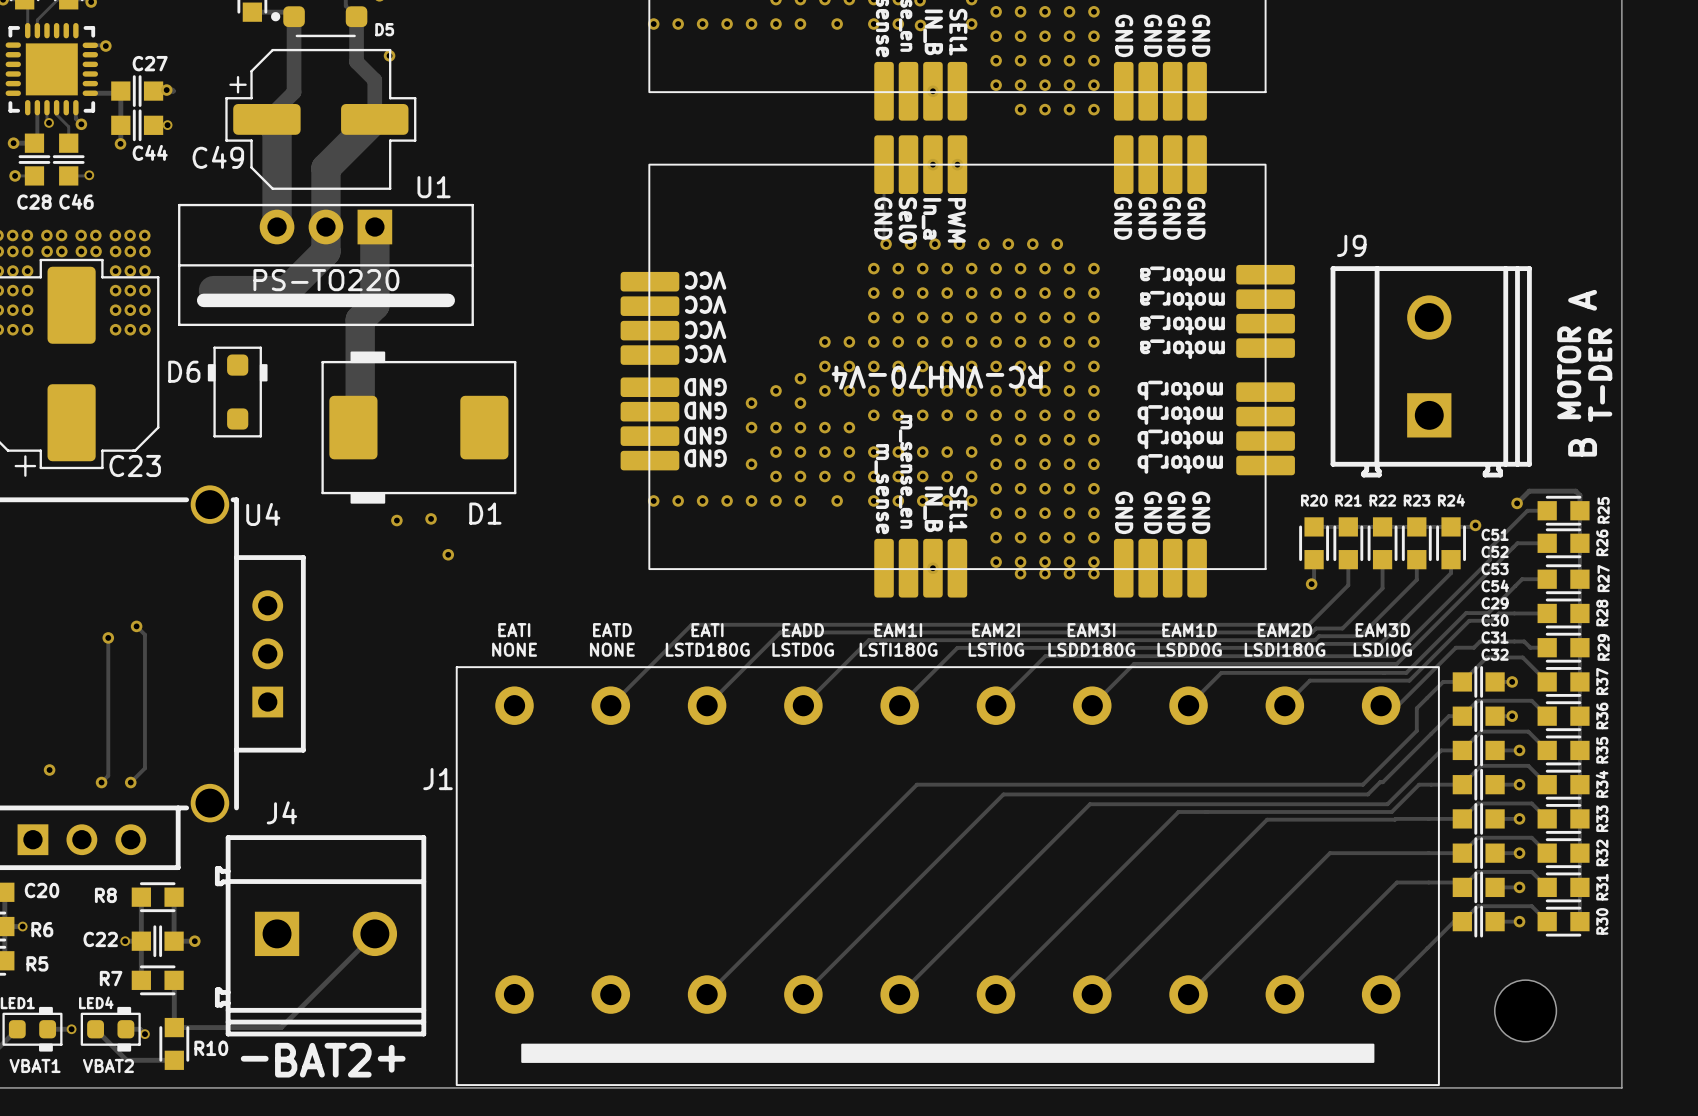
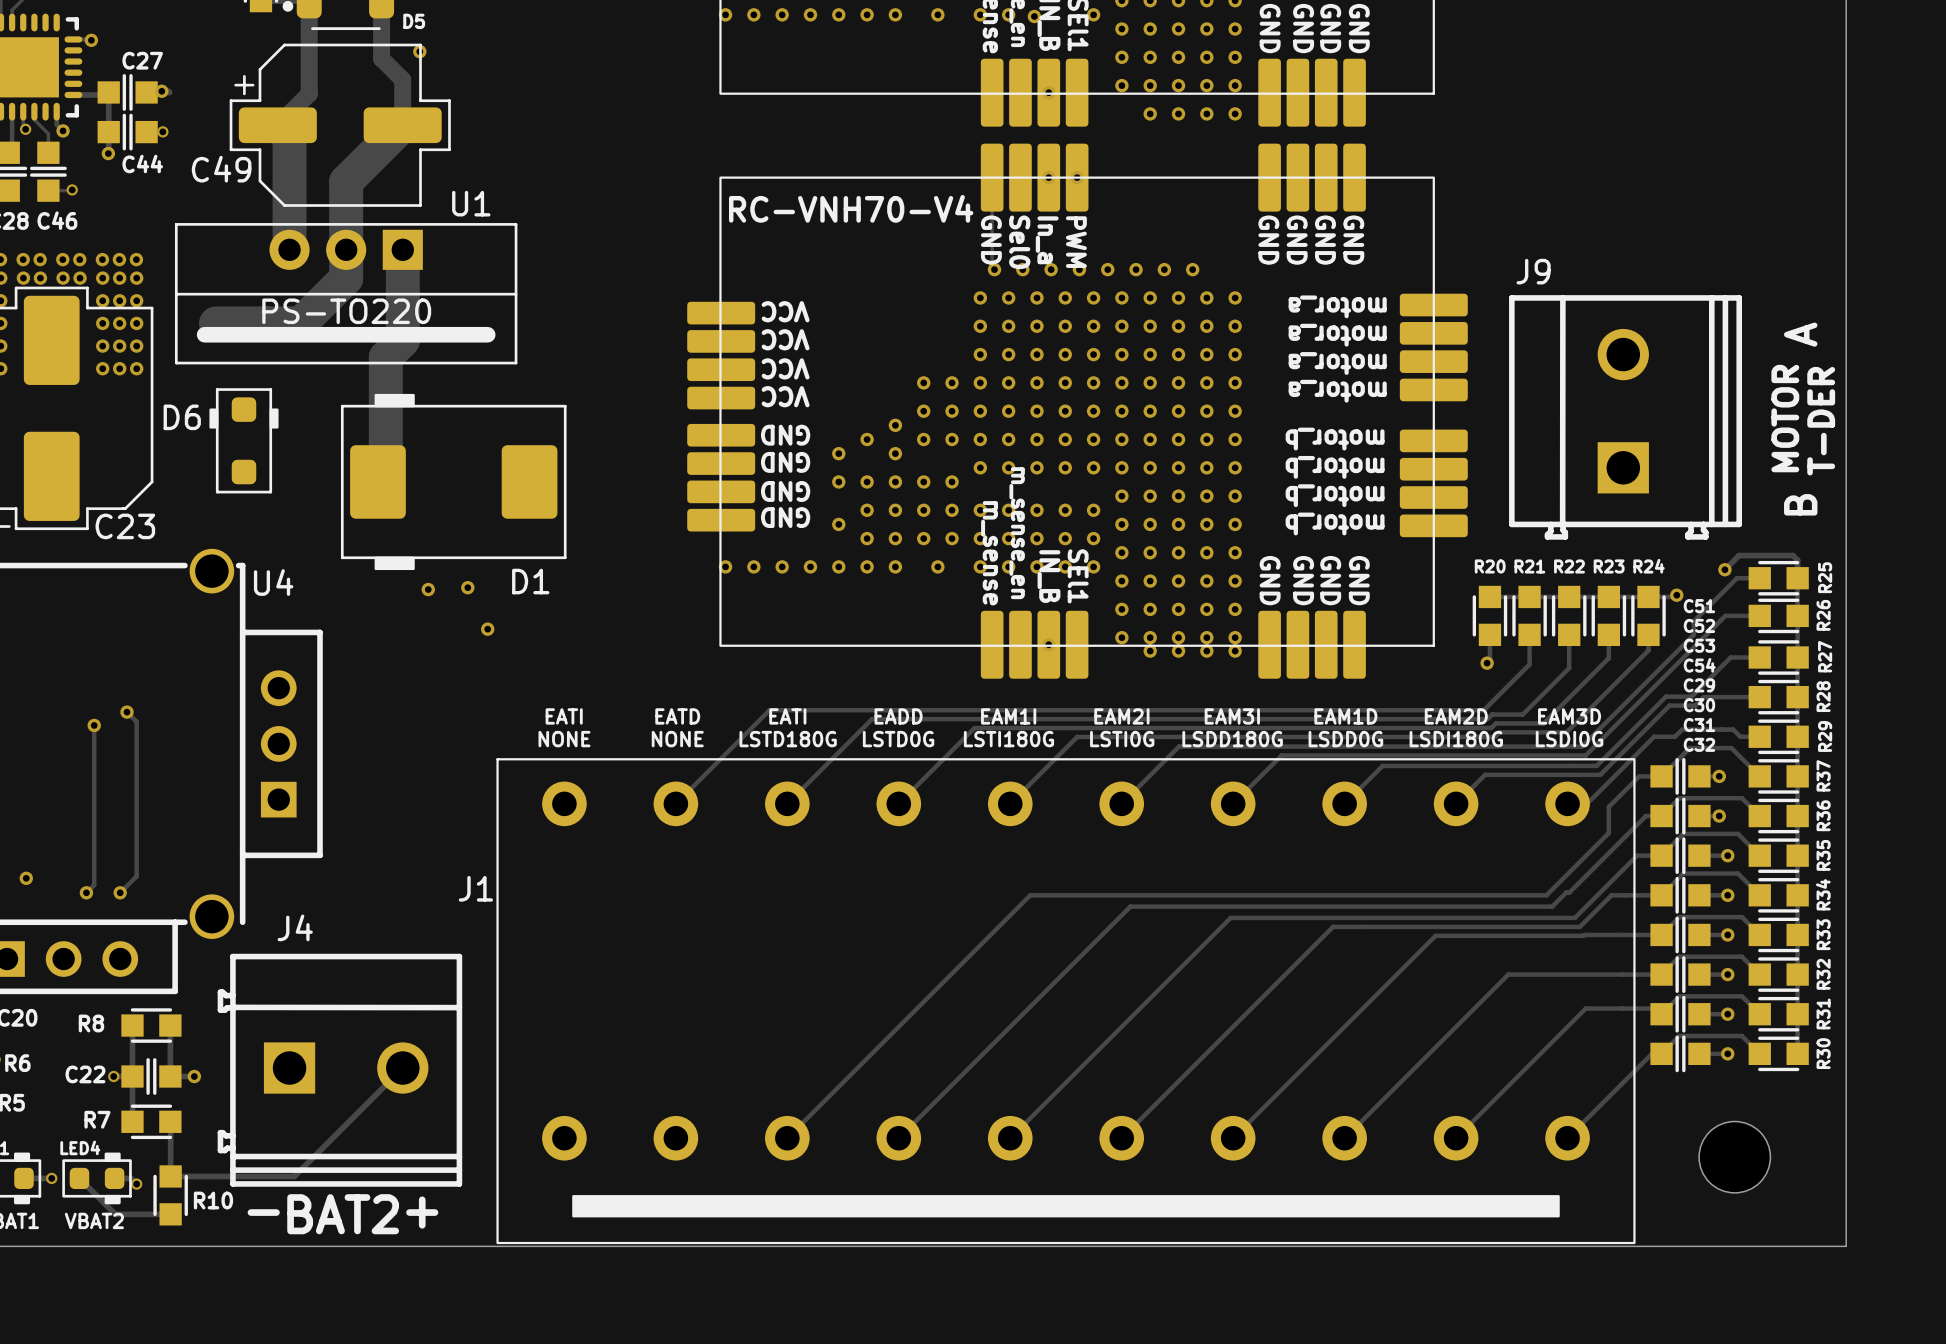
RC-VNH70-V4 name rotation: 0° (937, 377) -> 180° (851, 208)
RC-VNH70-V4 name position: RC-VNH70-V4 (937, 377) -> RC-VNH70-V4 (851, 208)

